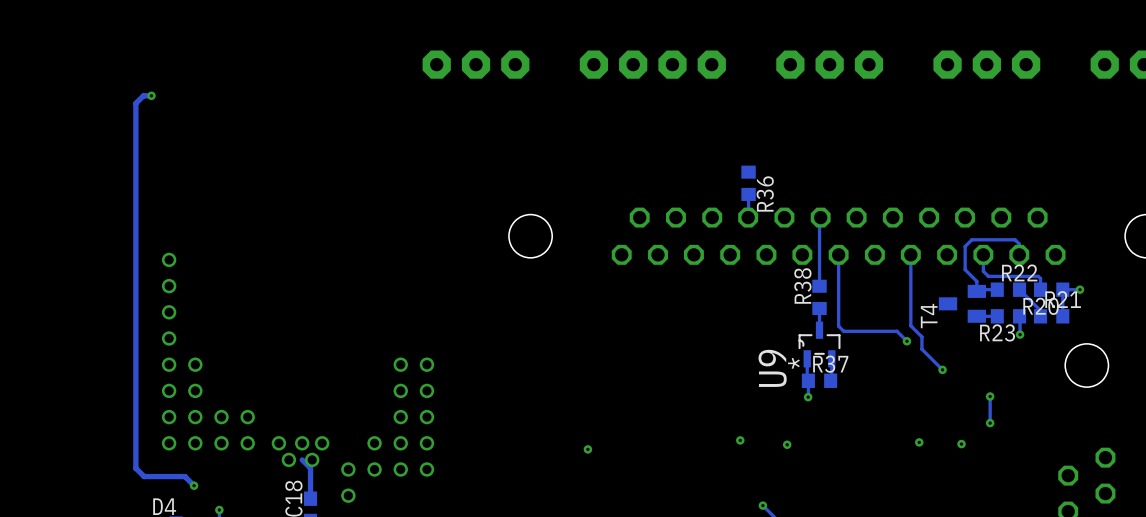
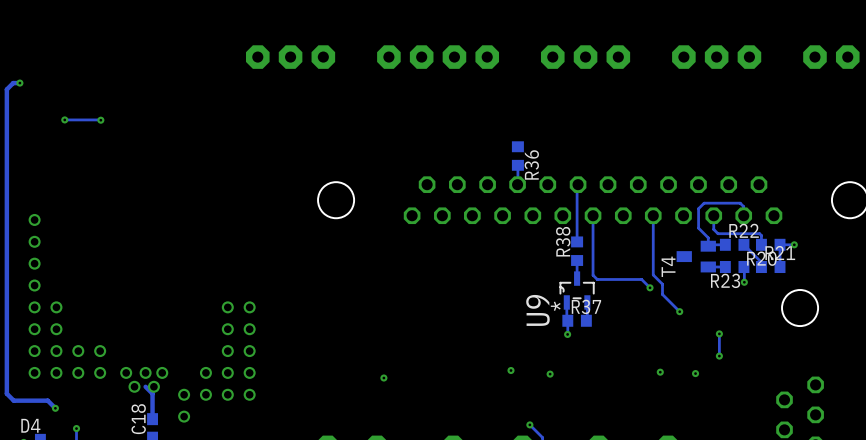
track: none -> (64, 119) (100, 120)
via: none -> (64, 119)
via: none -> (100, 120)

